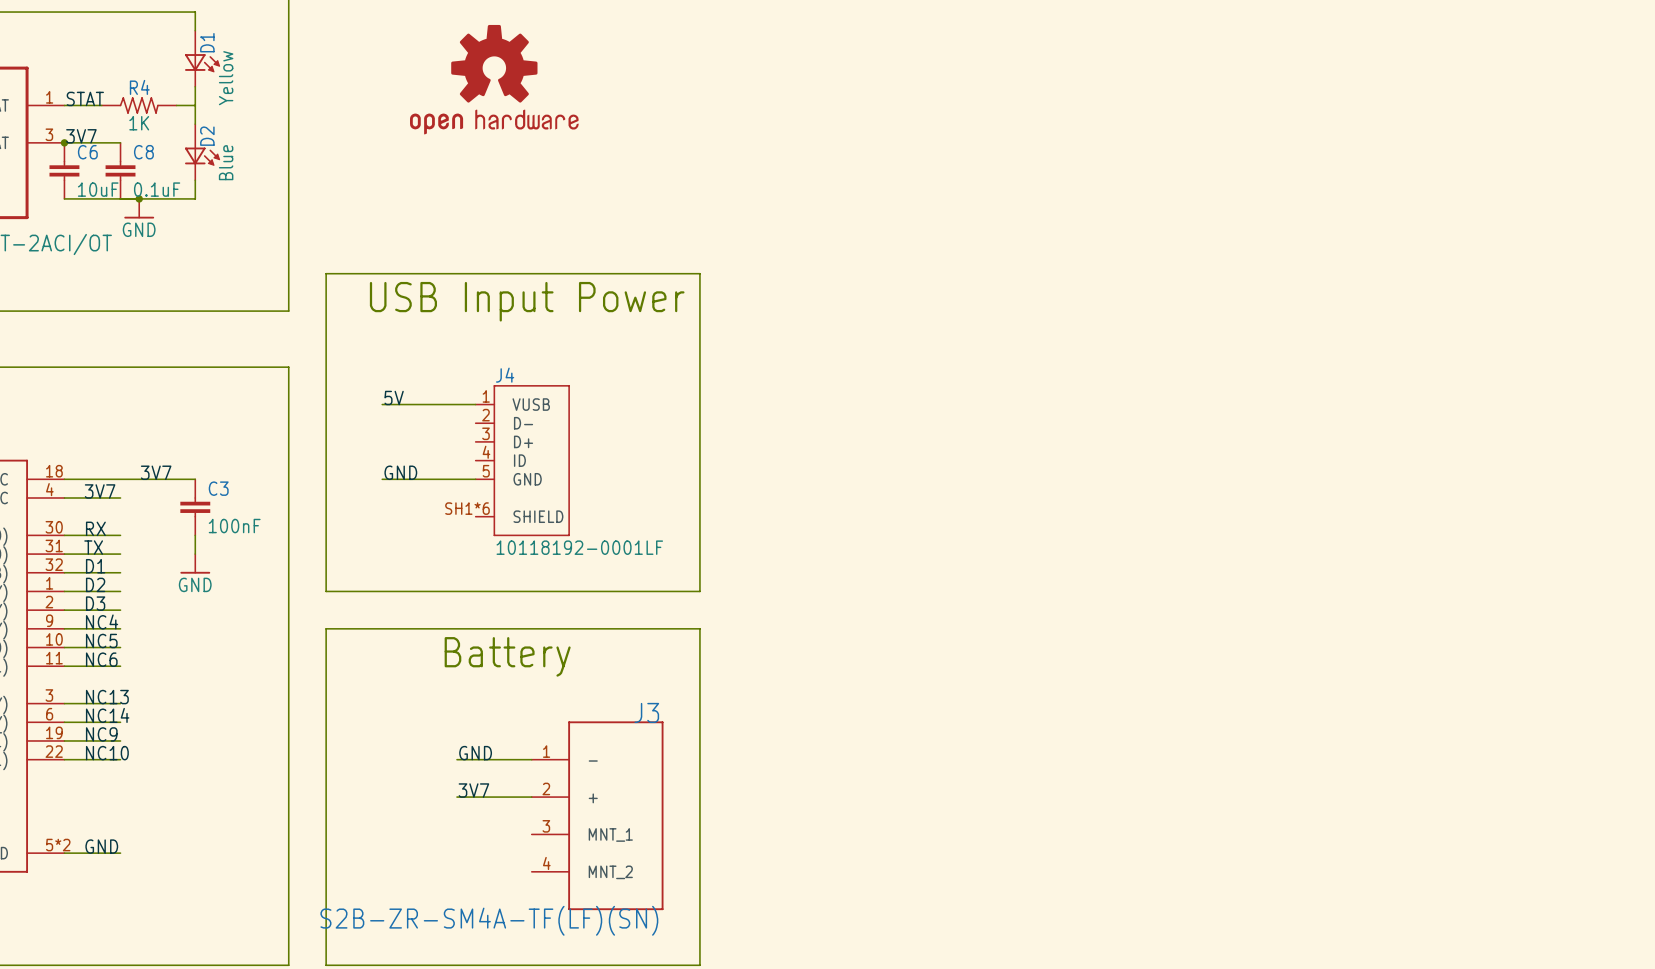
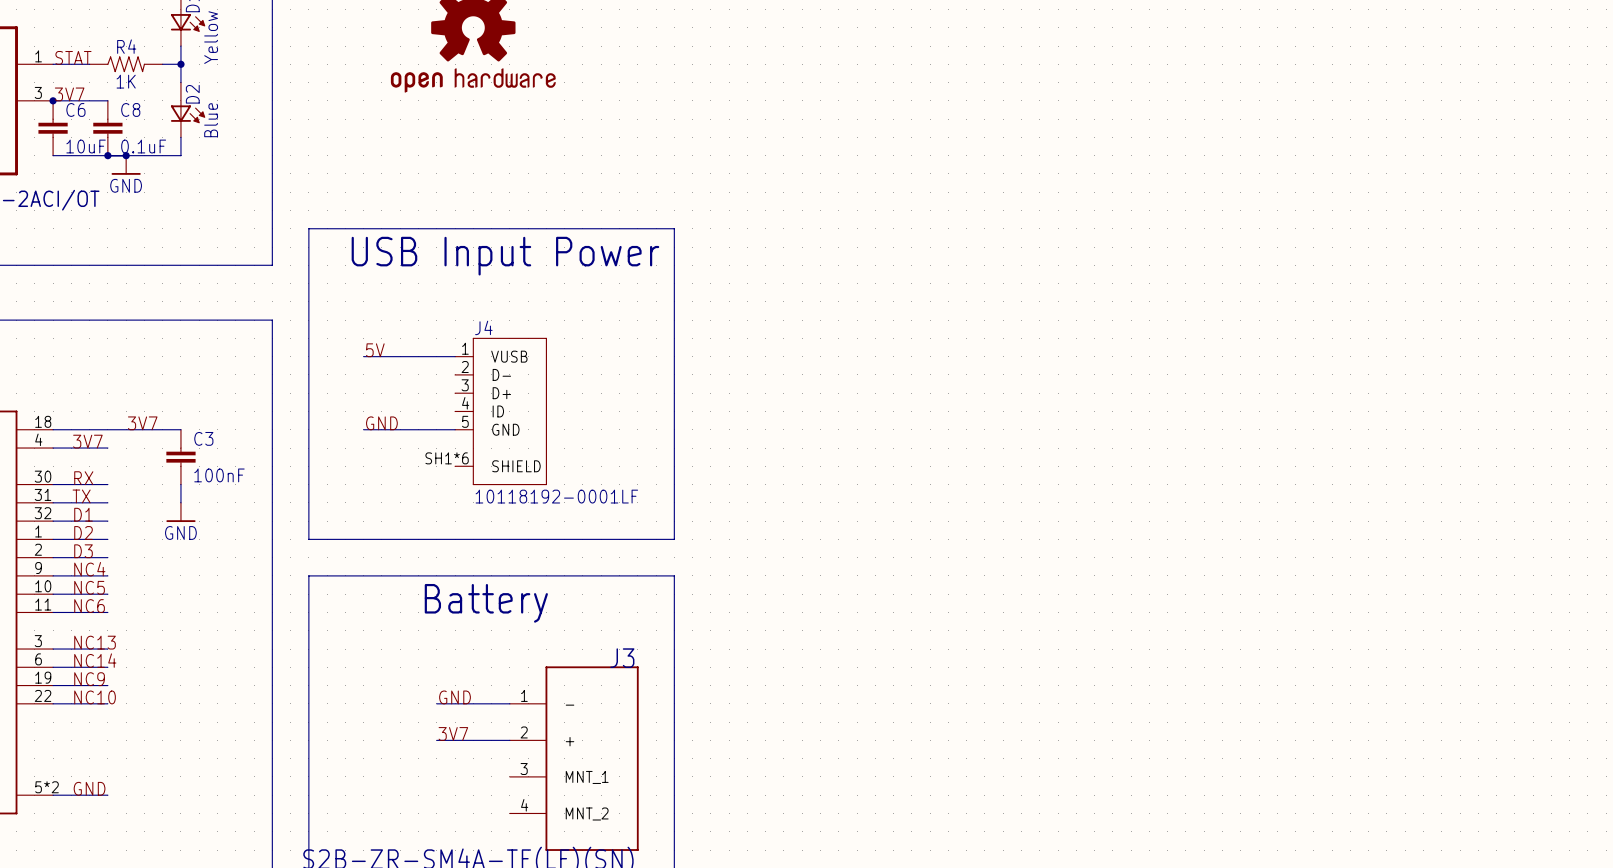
junction: none -> (180, 64)
junction: none -> (107, 155)

